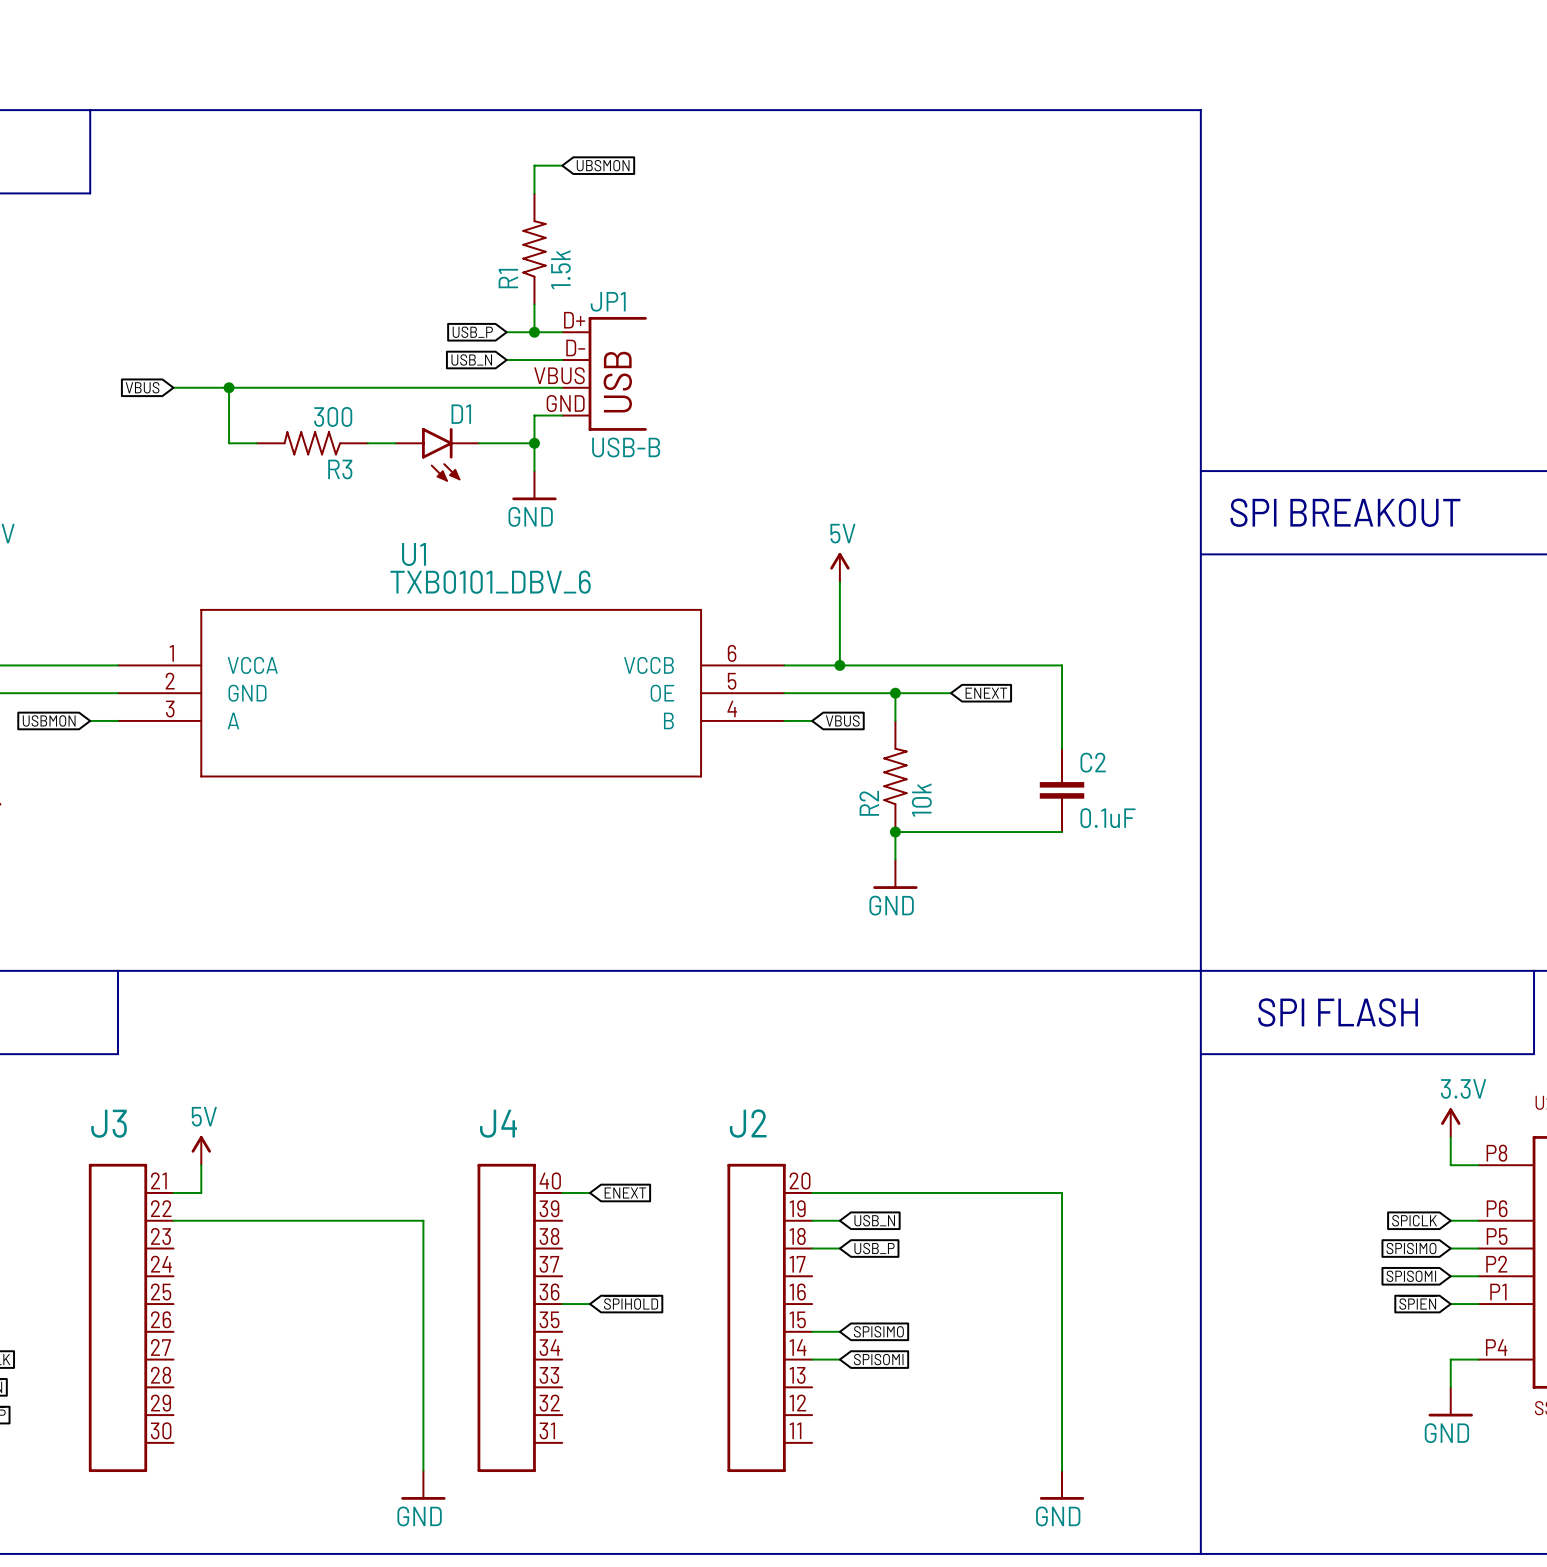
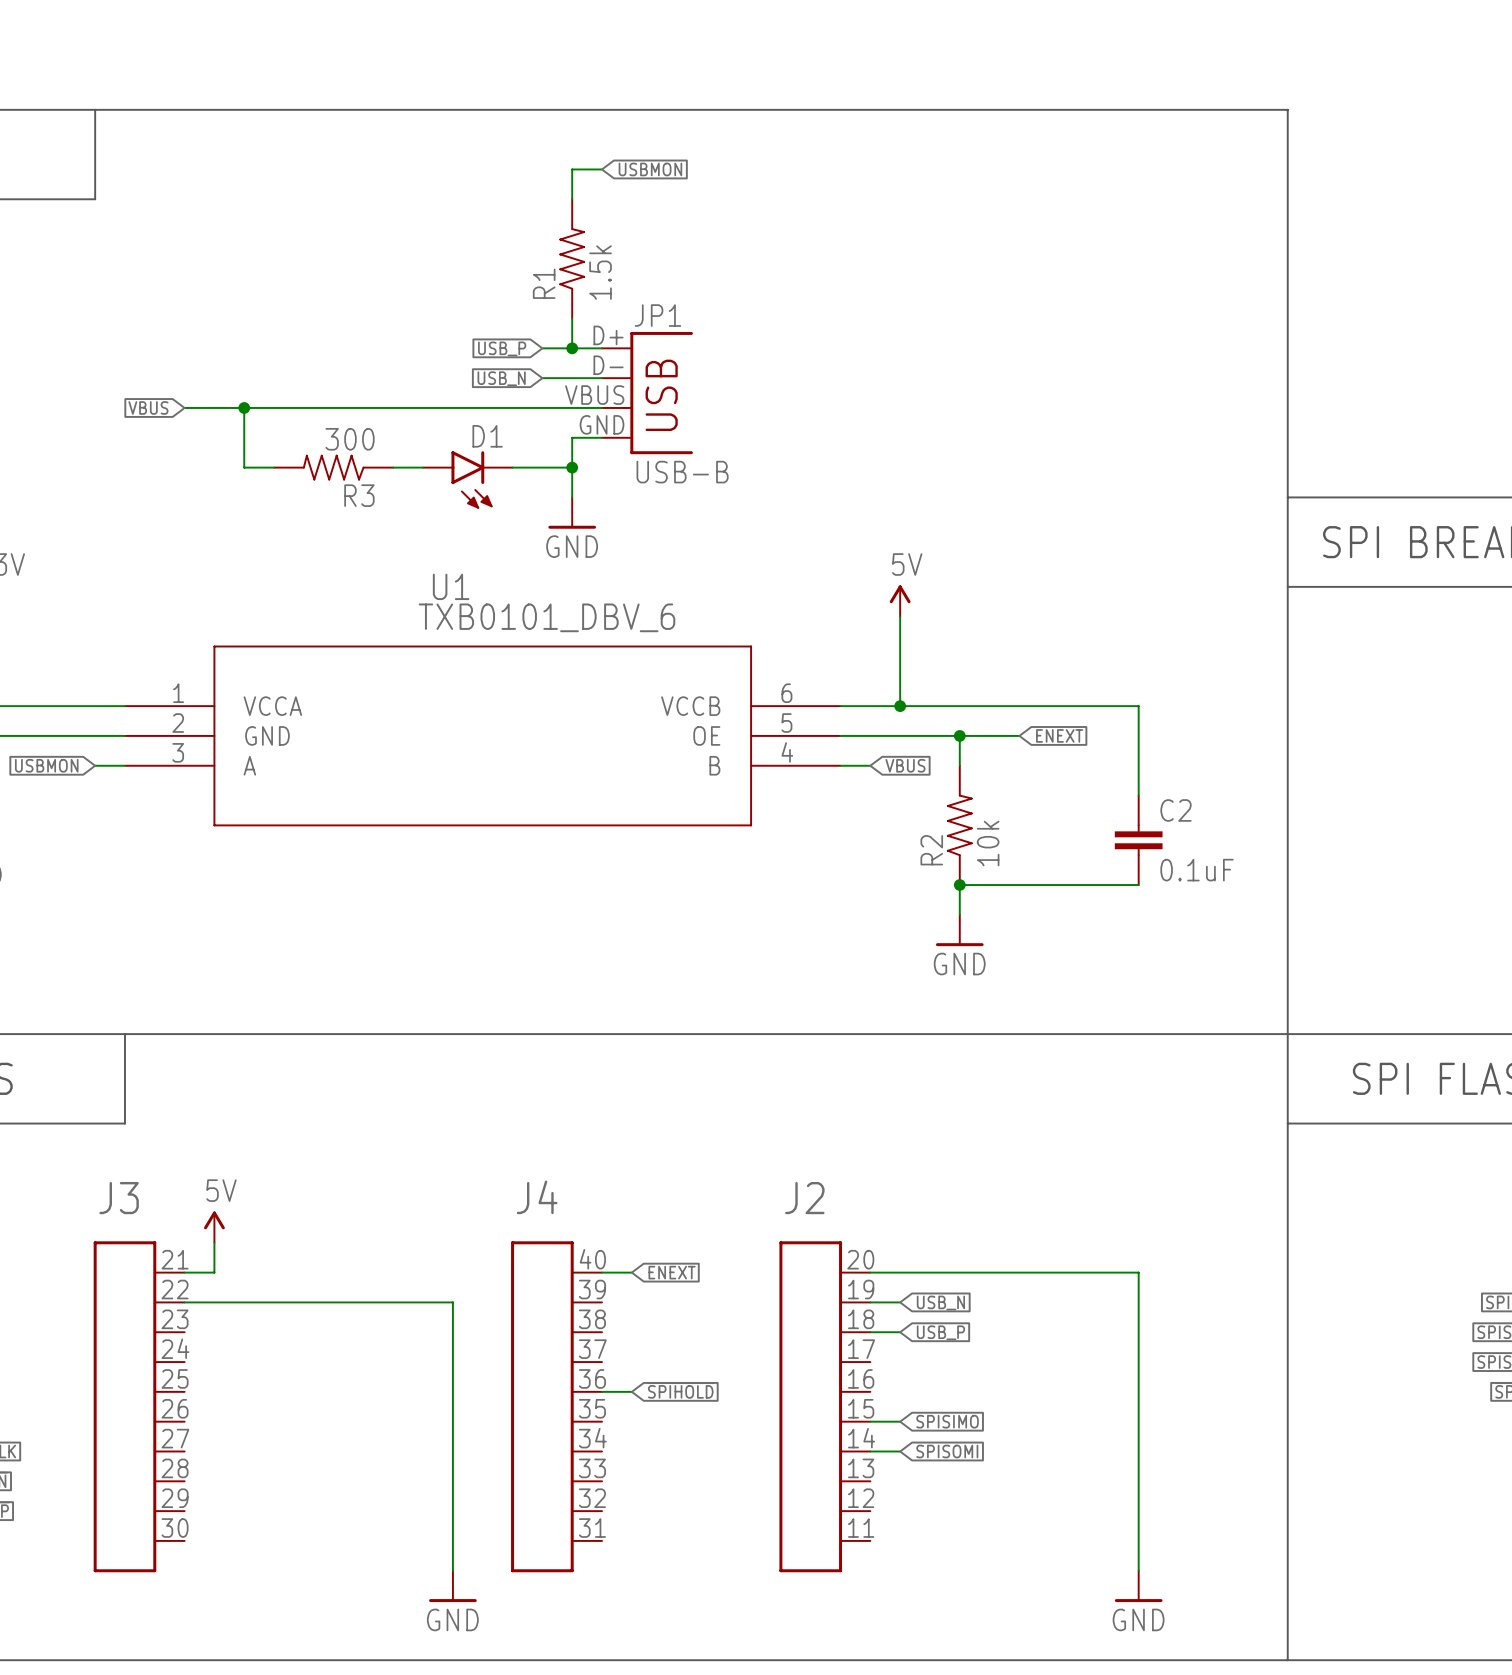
global label: UBSMON (603, 165) -> USBMON (650, 169)

